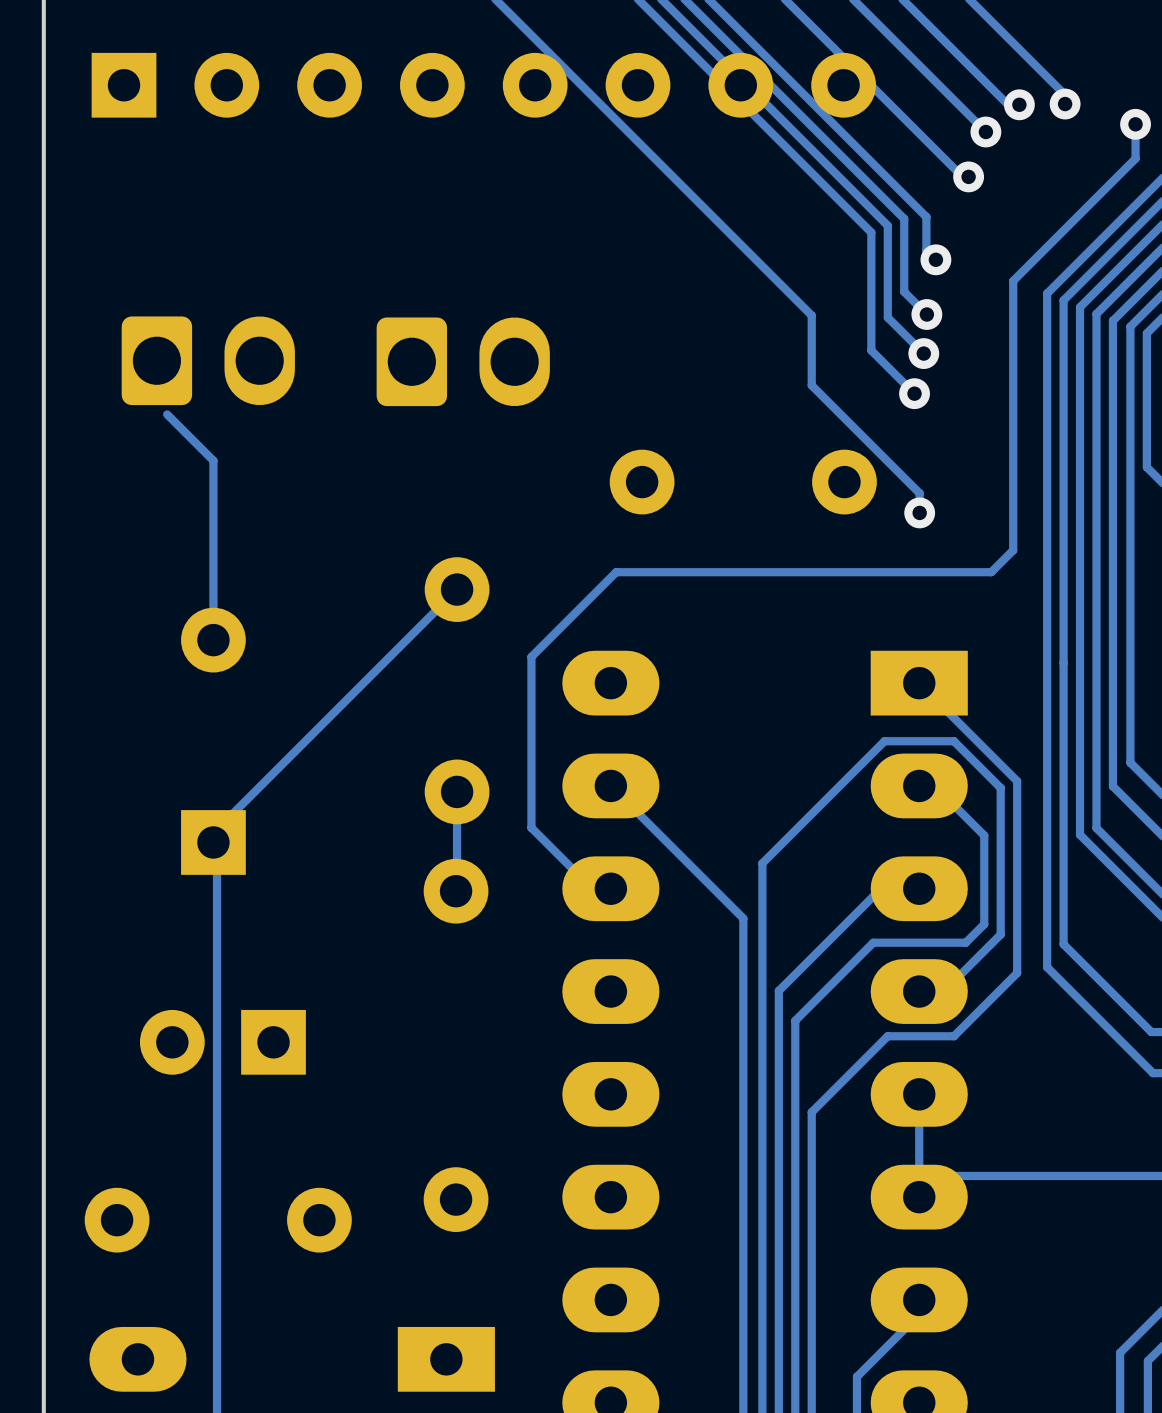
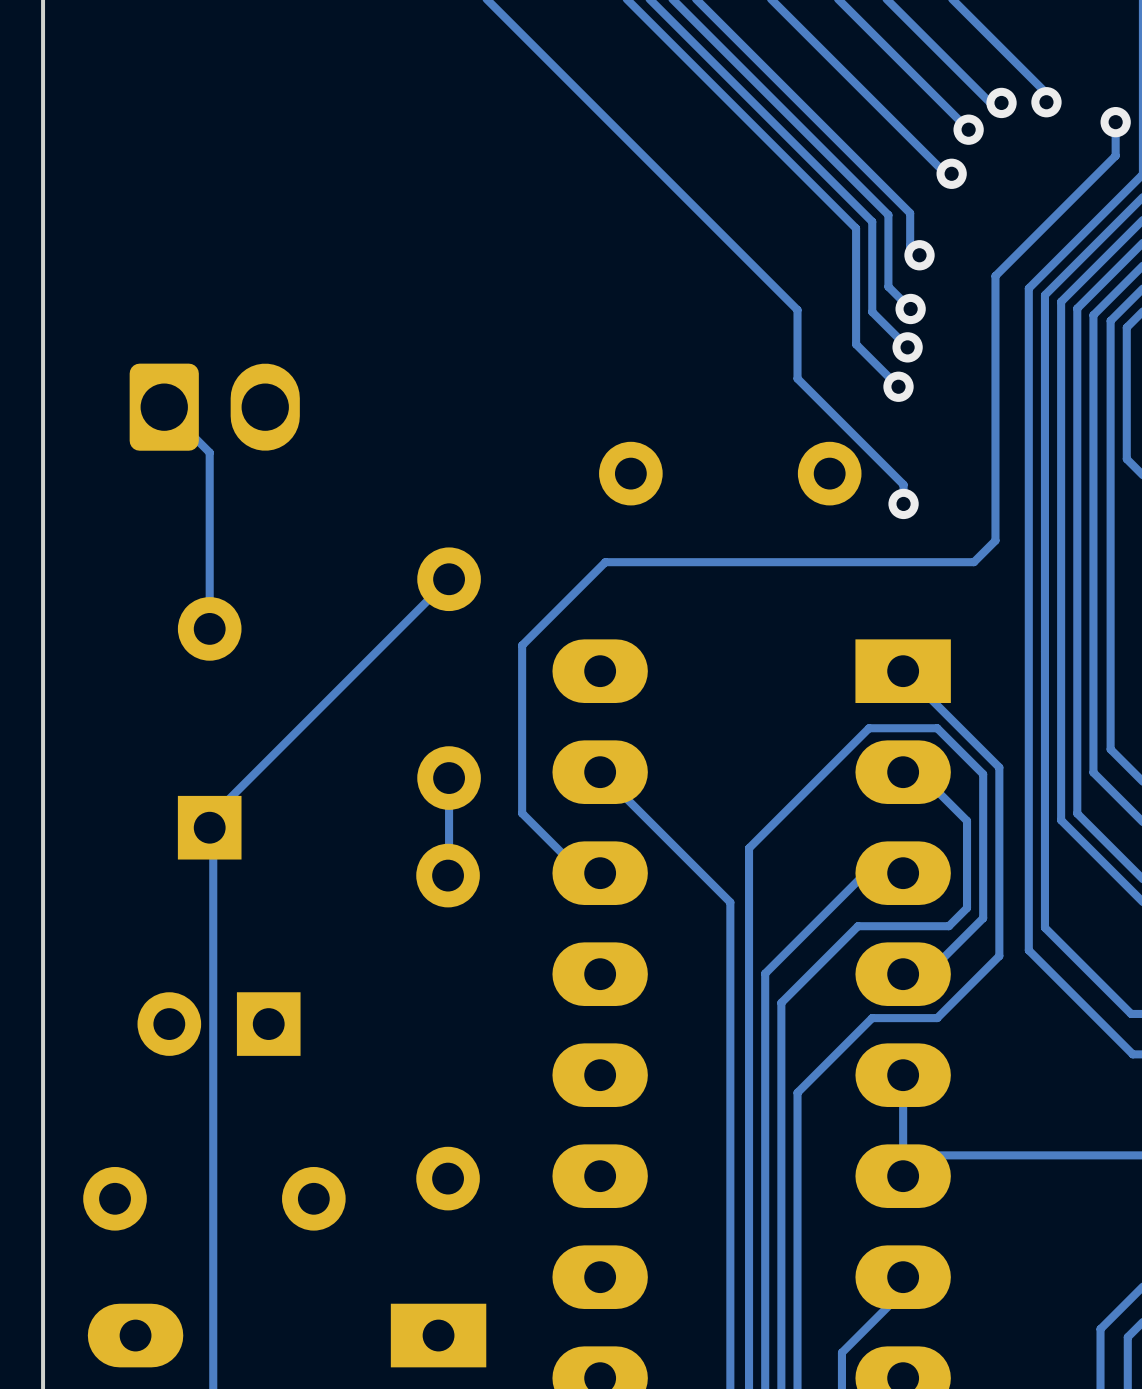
part: (483, 85) -> none
part position: (208, 360) -> (214, 407)
part: (463, 361) -> none

